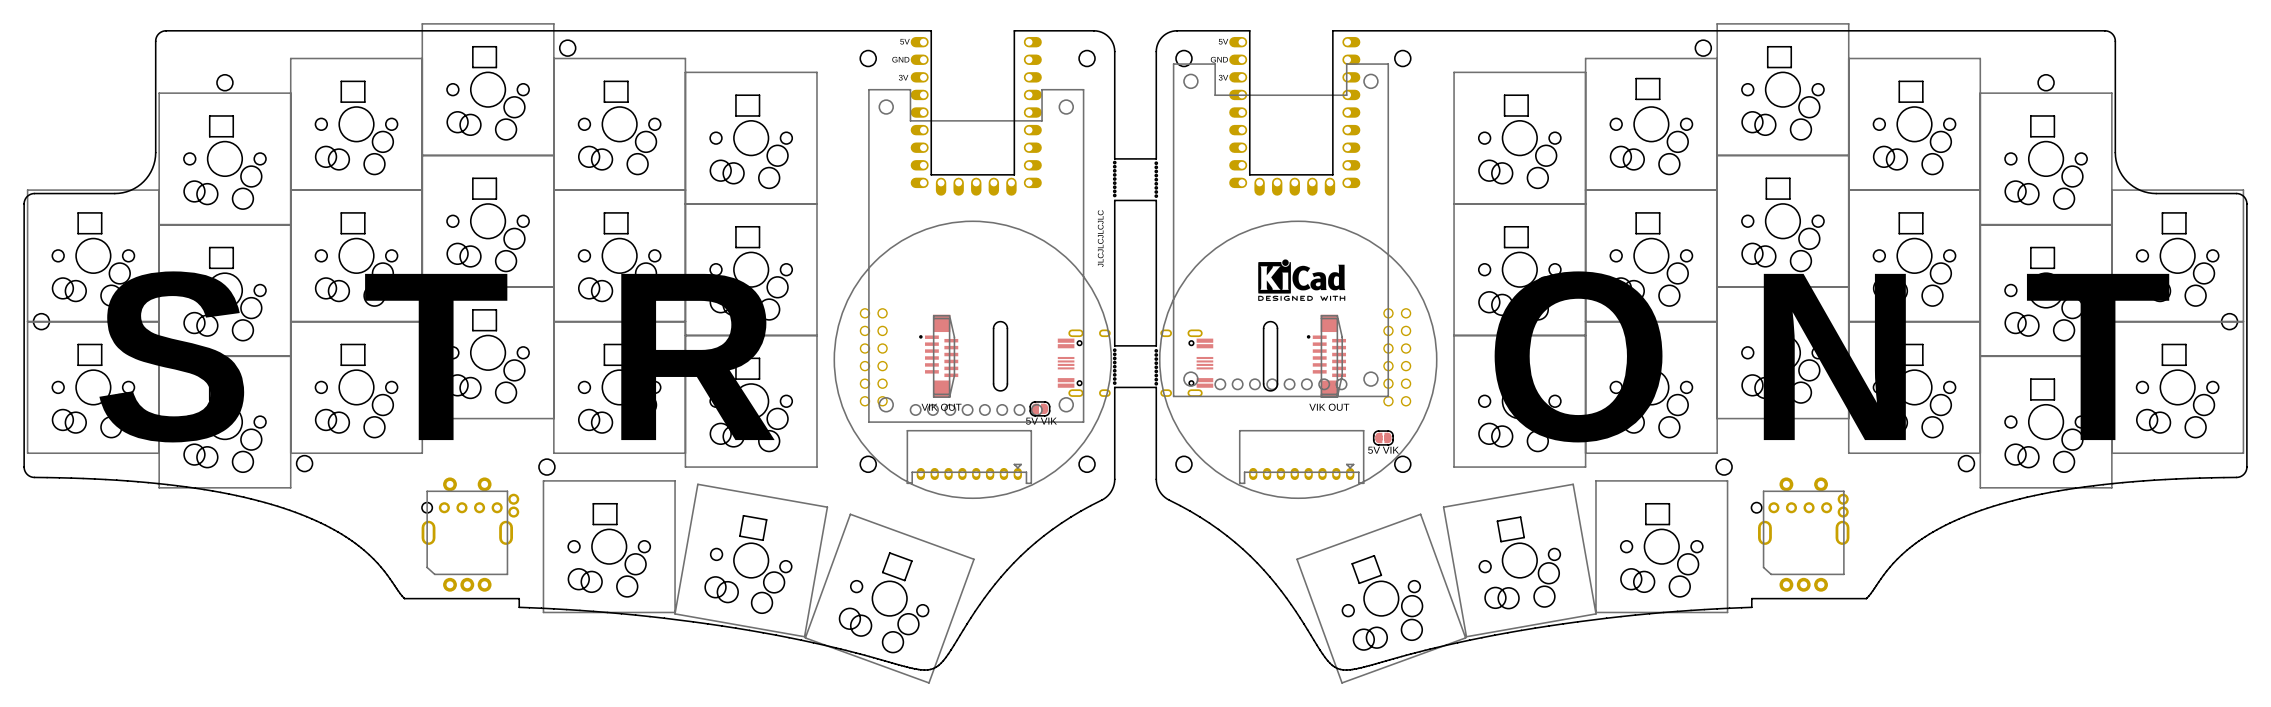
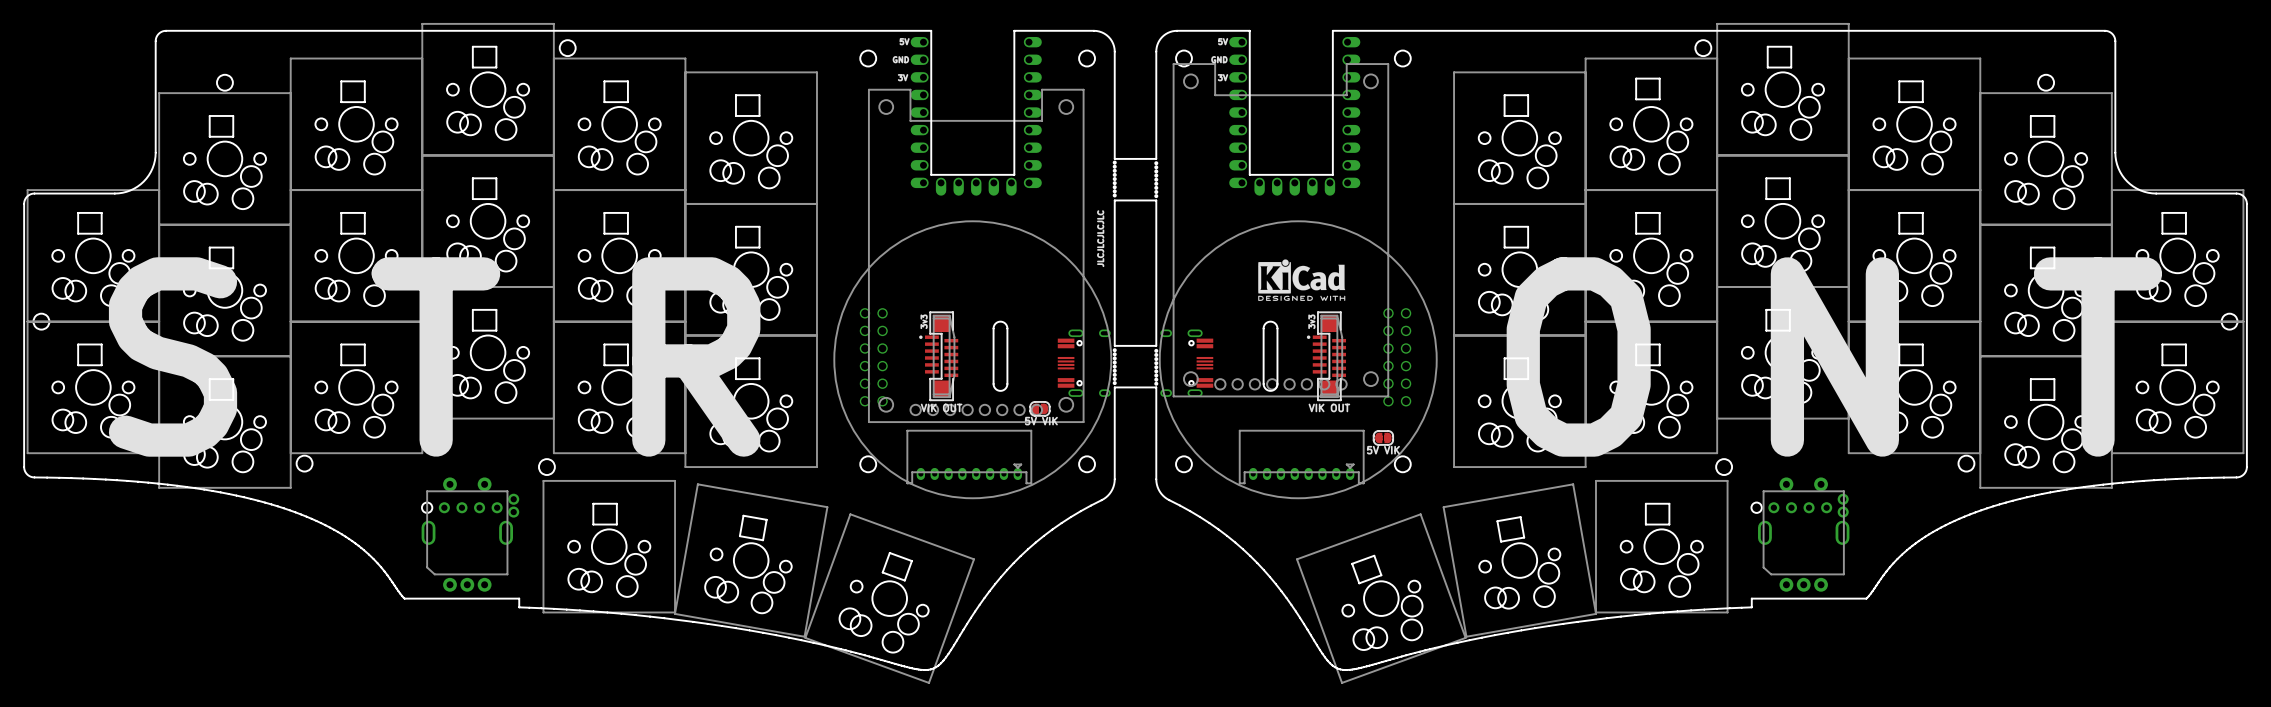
part footprint: [919, 314, 959, 398] -> [919, 311, 959, 401]
part footprint: [1306, 314, 1347, 398] -> [1306, 311, 1347, 401]

